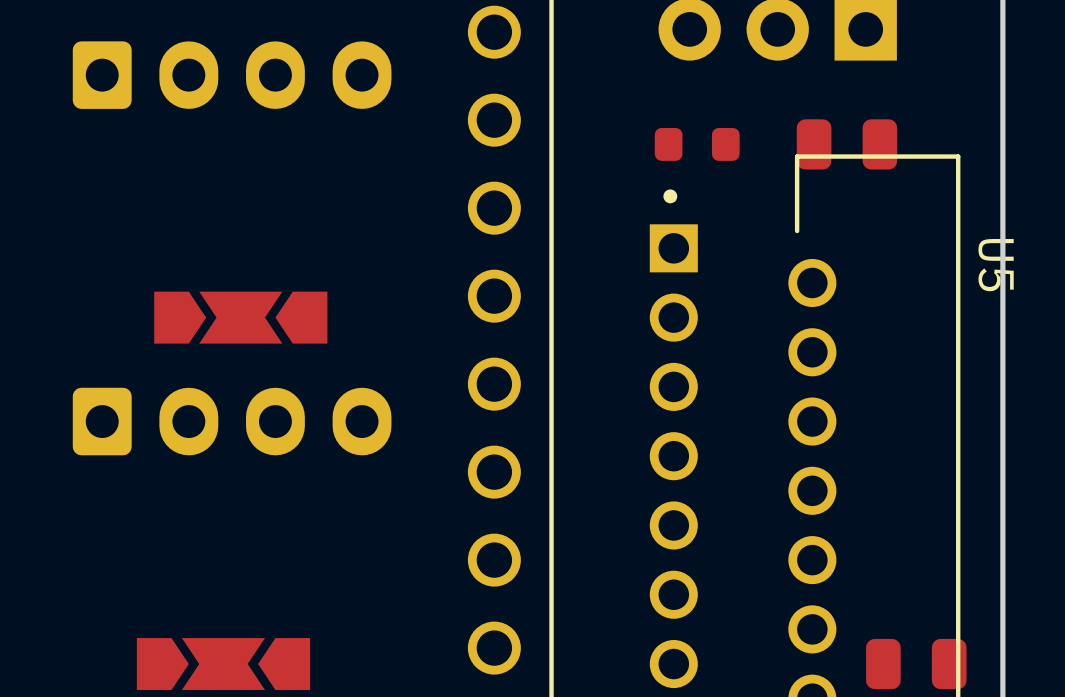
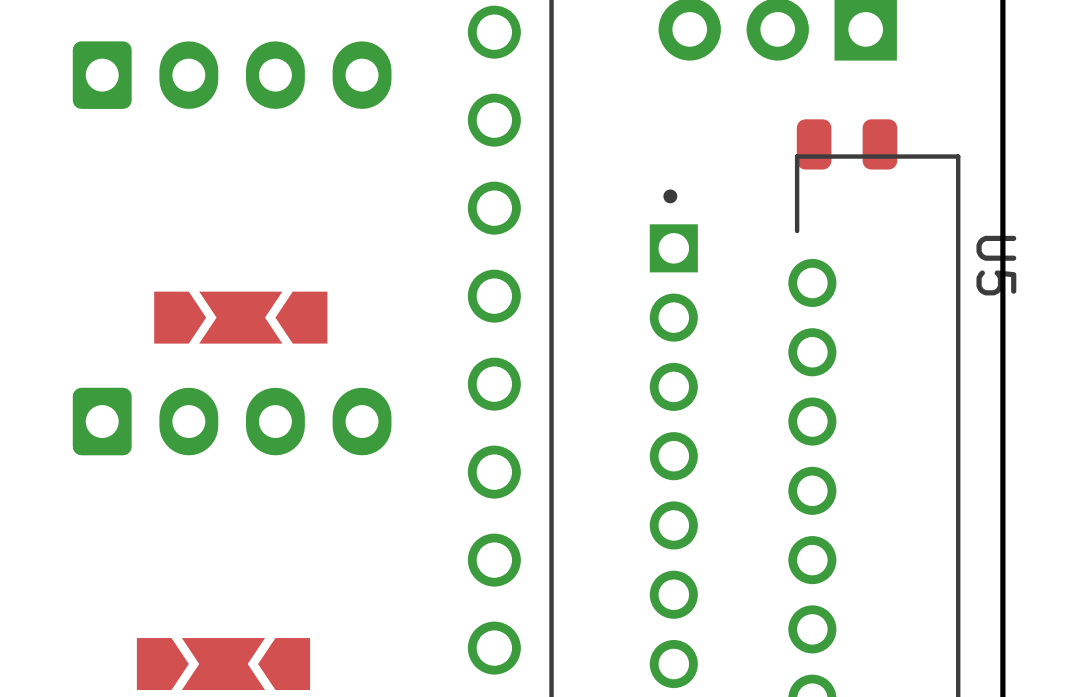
part: (697, 144) -> none
part: (916, 664) -> none

